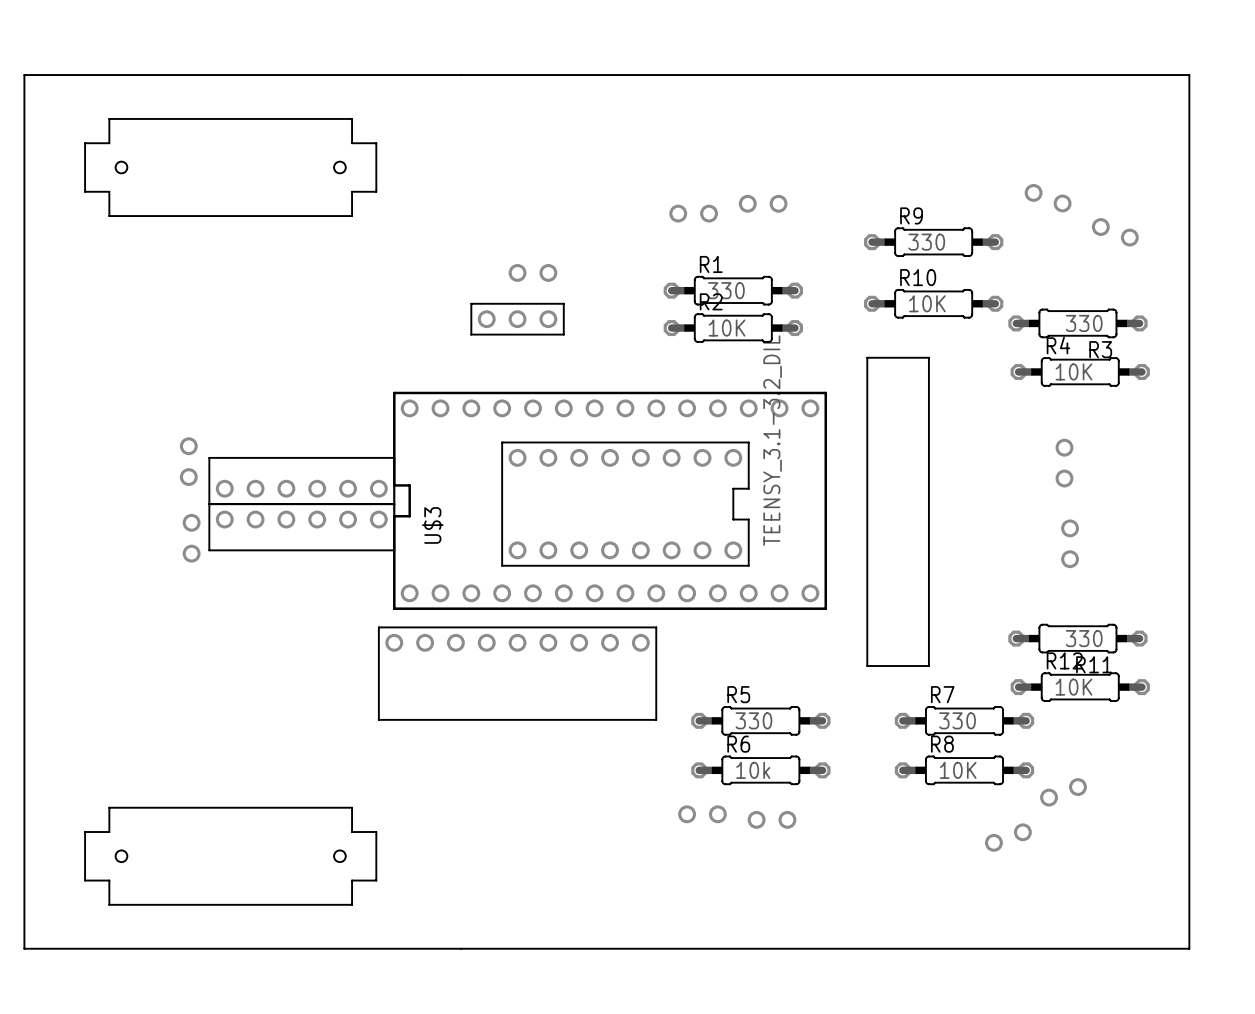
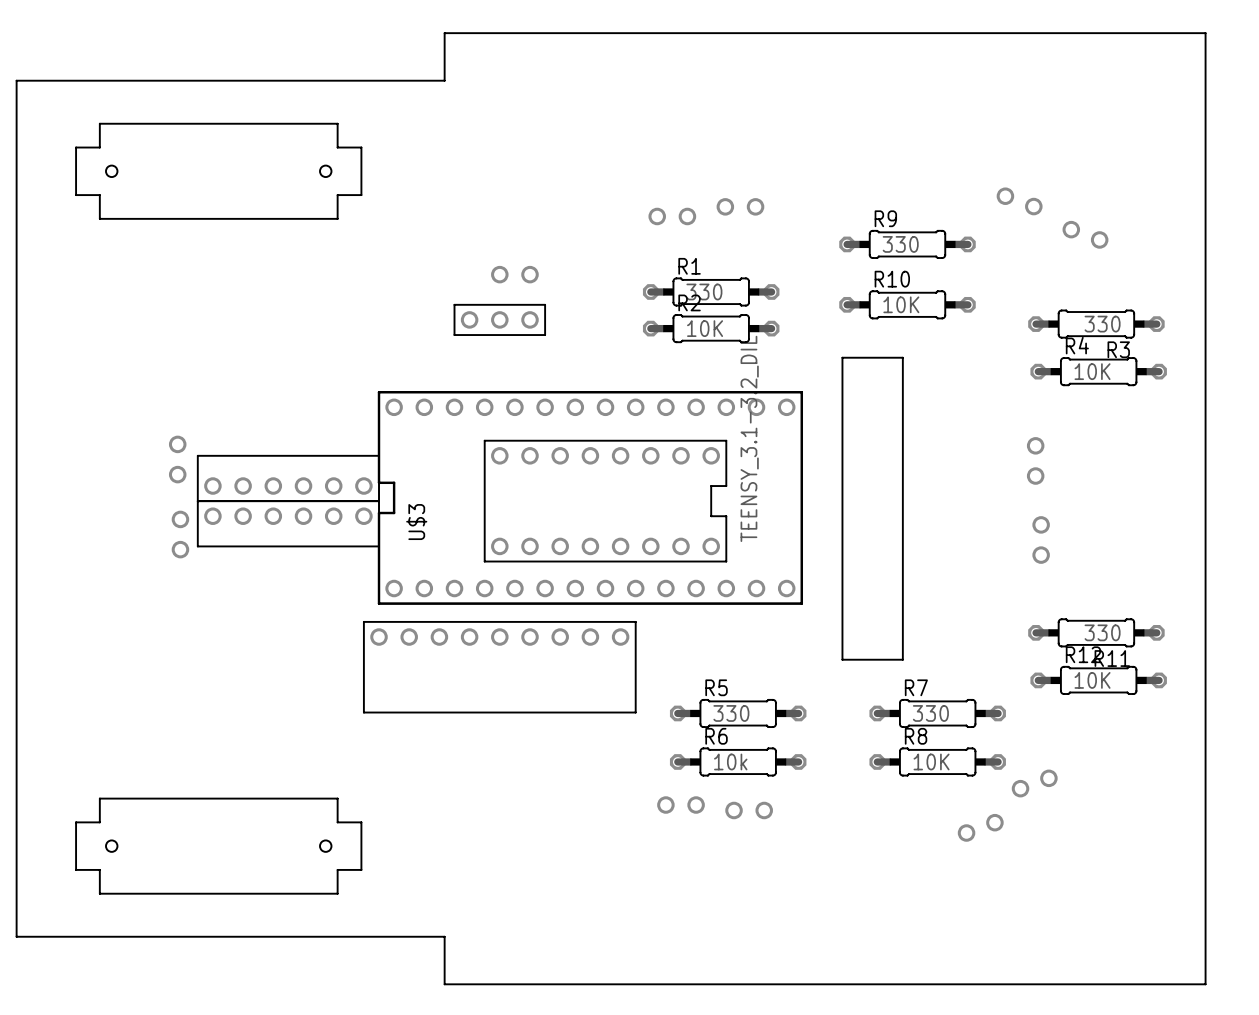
board edge: (461, 75) (1189, 75) (1189, 948) (461, 948) -> (444, 80) (444, 33) (1205, 33) (1205, 984) (444, 984) (444, 936)
R3 position: (1077, 323) -> (1096, 324)
R4 position: (1080, 371) -> (1098, 371)
R11 position: (1077, 638) -> (1096, 632)
R12 position: (1080, 687) -> (1098, 680)

